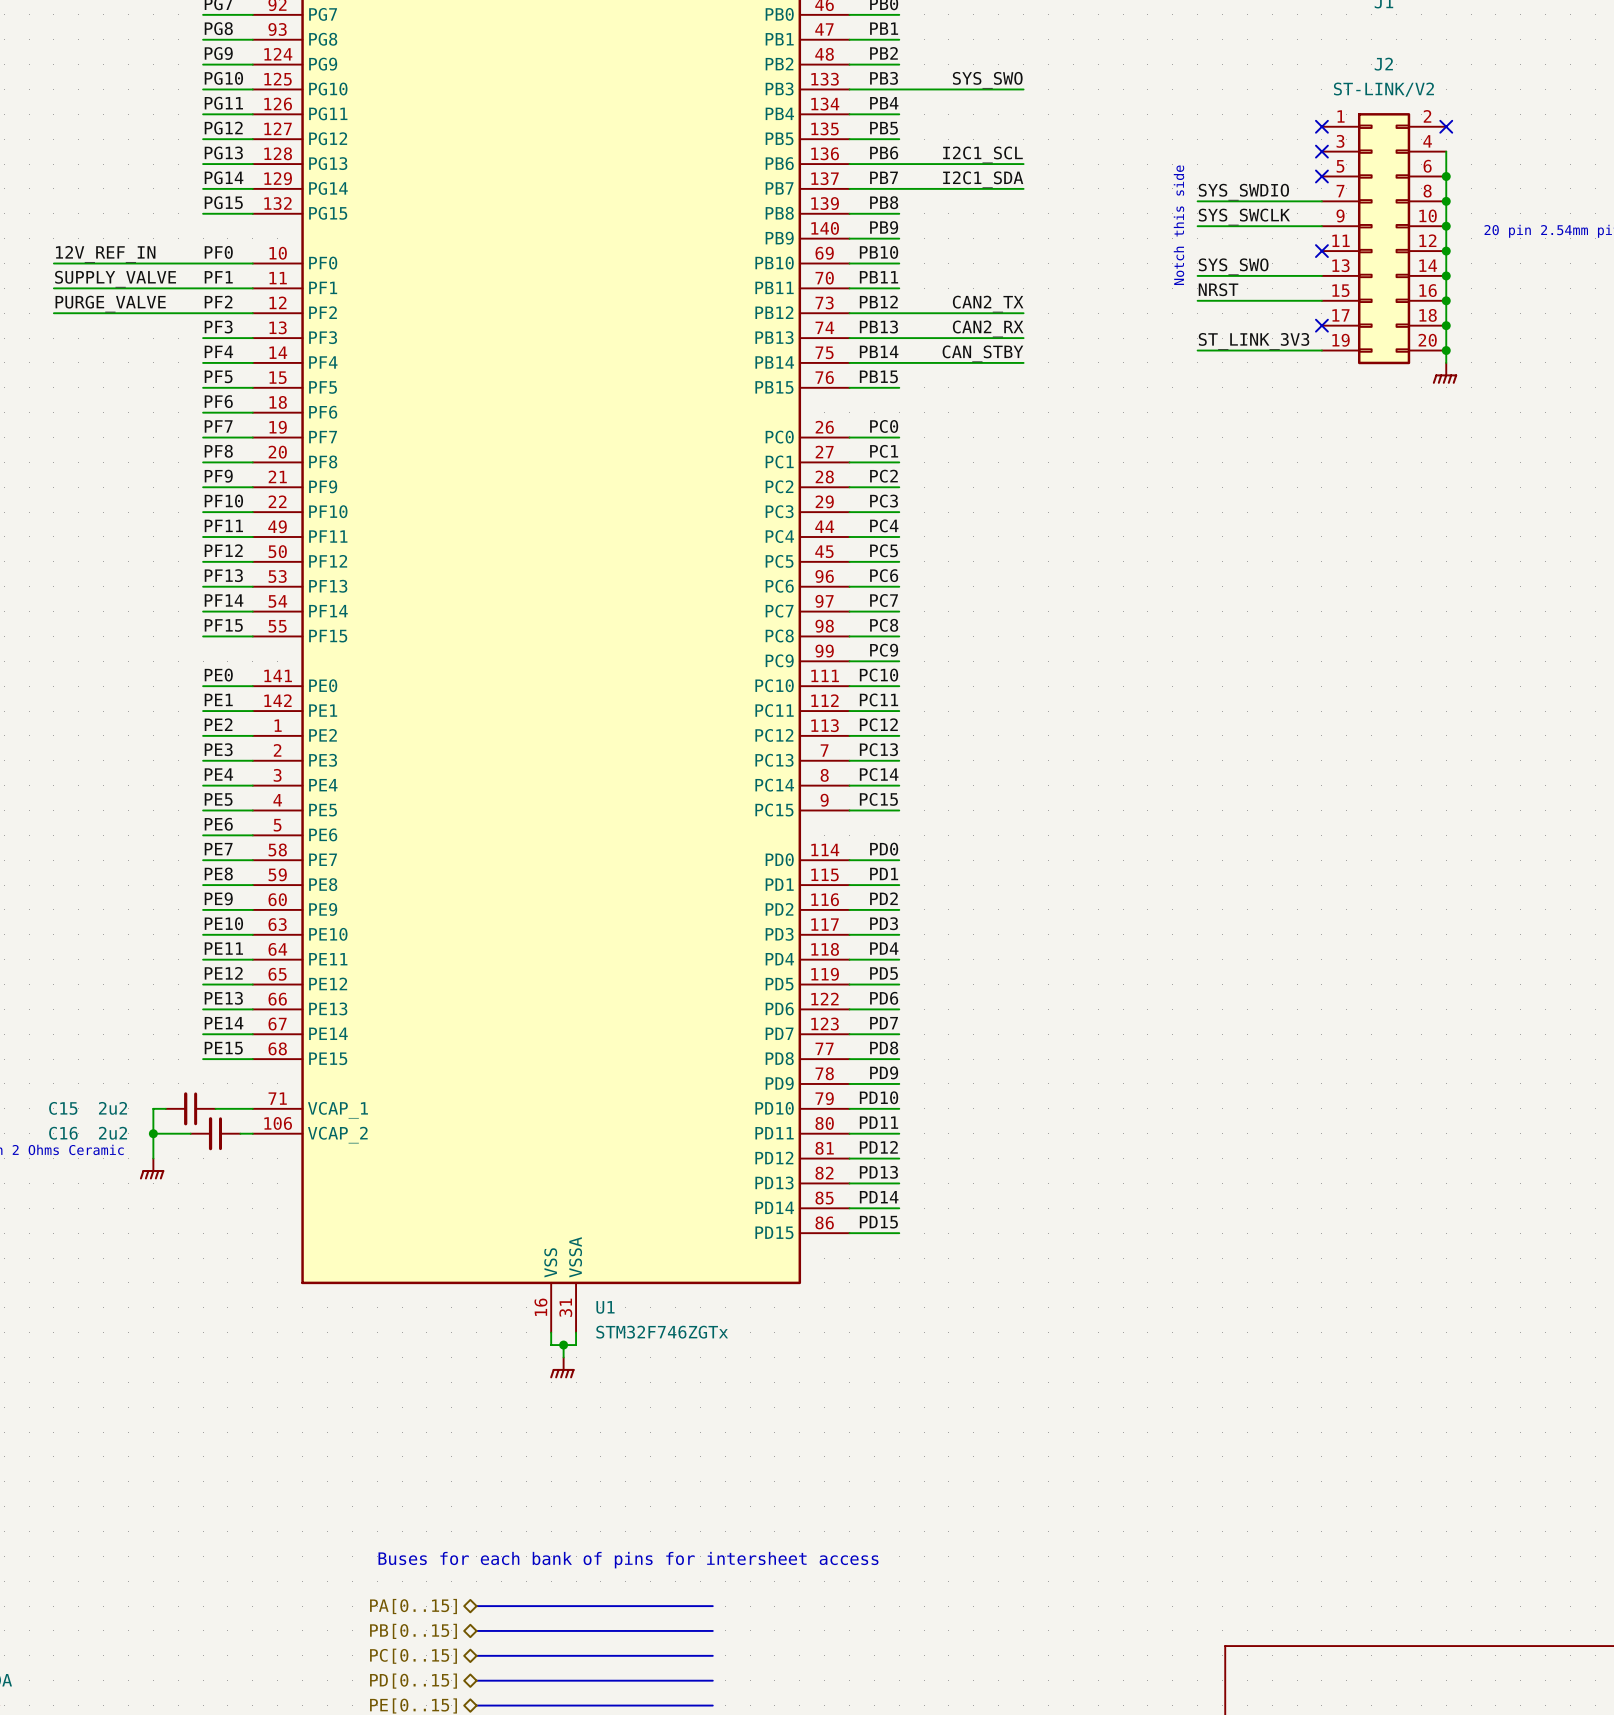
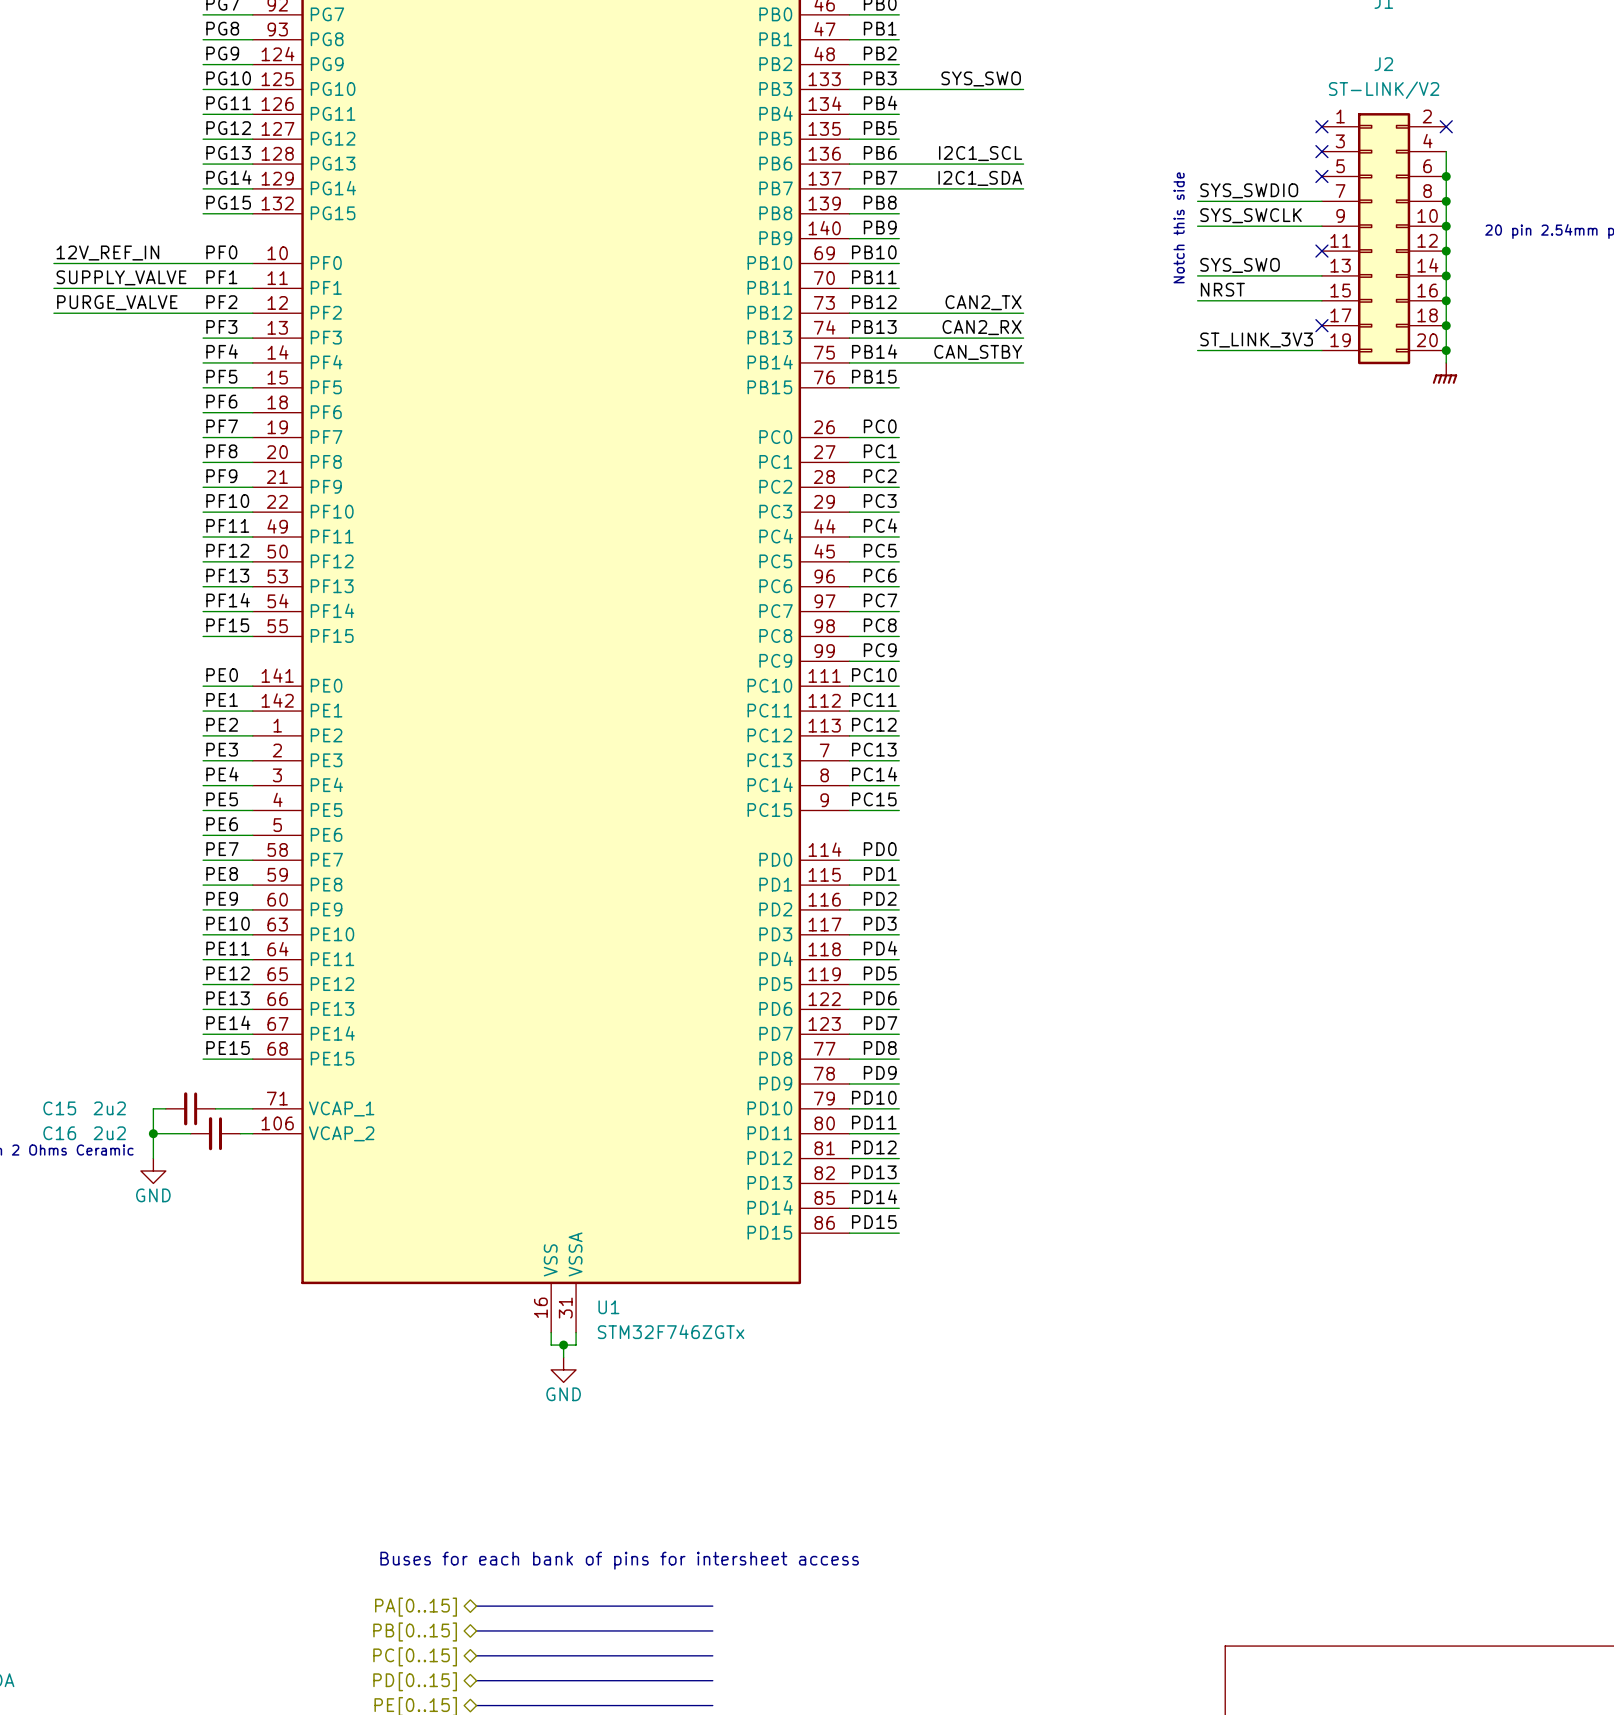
power symbol shape: [139, 1158, 165, 1180] -> [140, 1158, 166, 1184]
power symbol text: none -> GND (153, 1195)
power symbol shape: [550, 1357, 575, 1379] -> [551, 1357, 577, 1383]
power symbol text: none -> GND (563, 1394)

